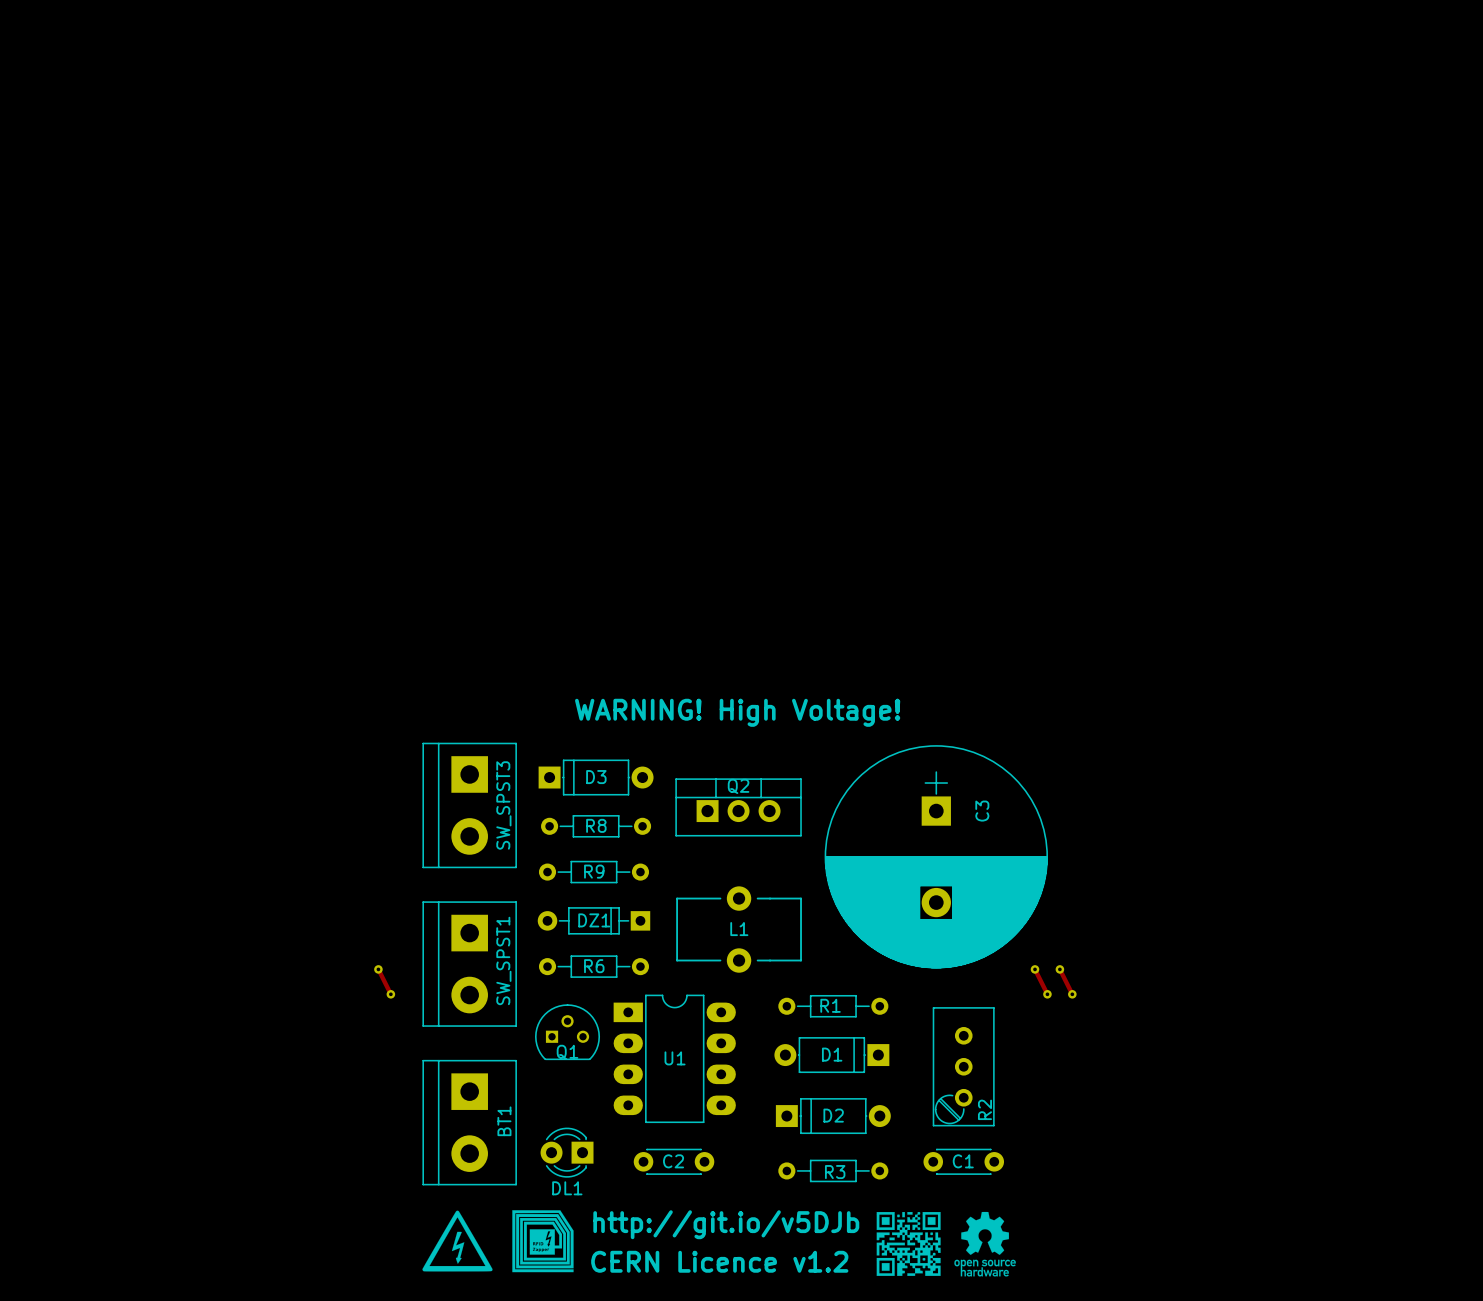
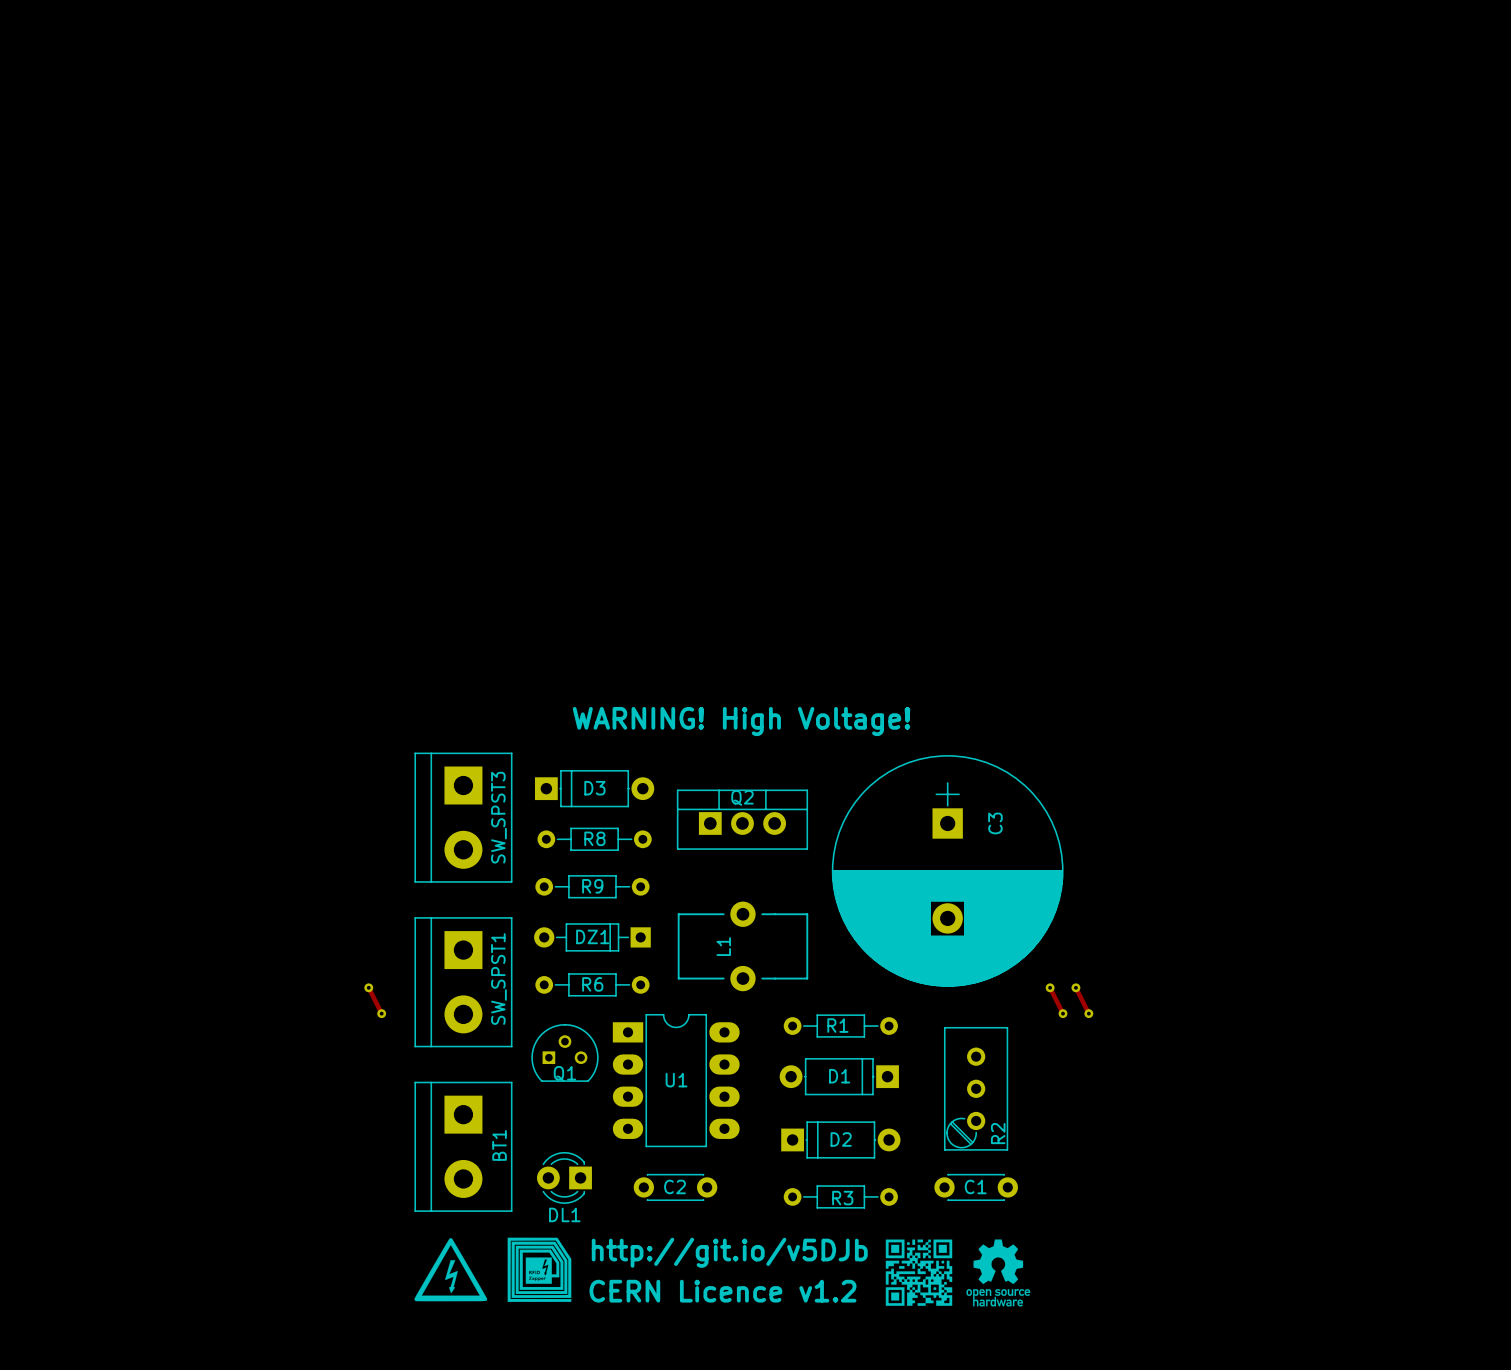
L1 name rotation: 0° (739, 929) -> 90° counterclockwise (723, 946)

